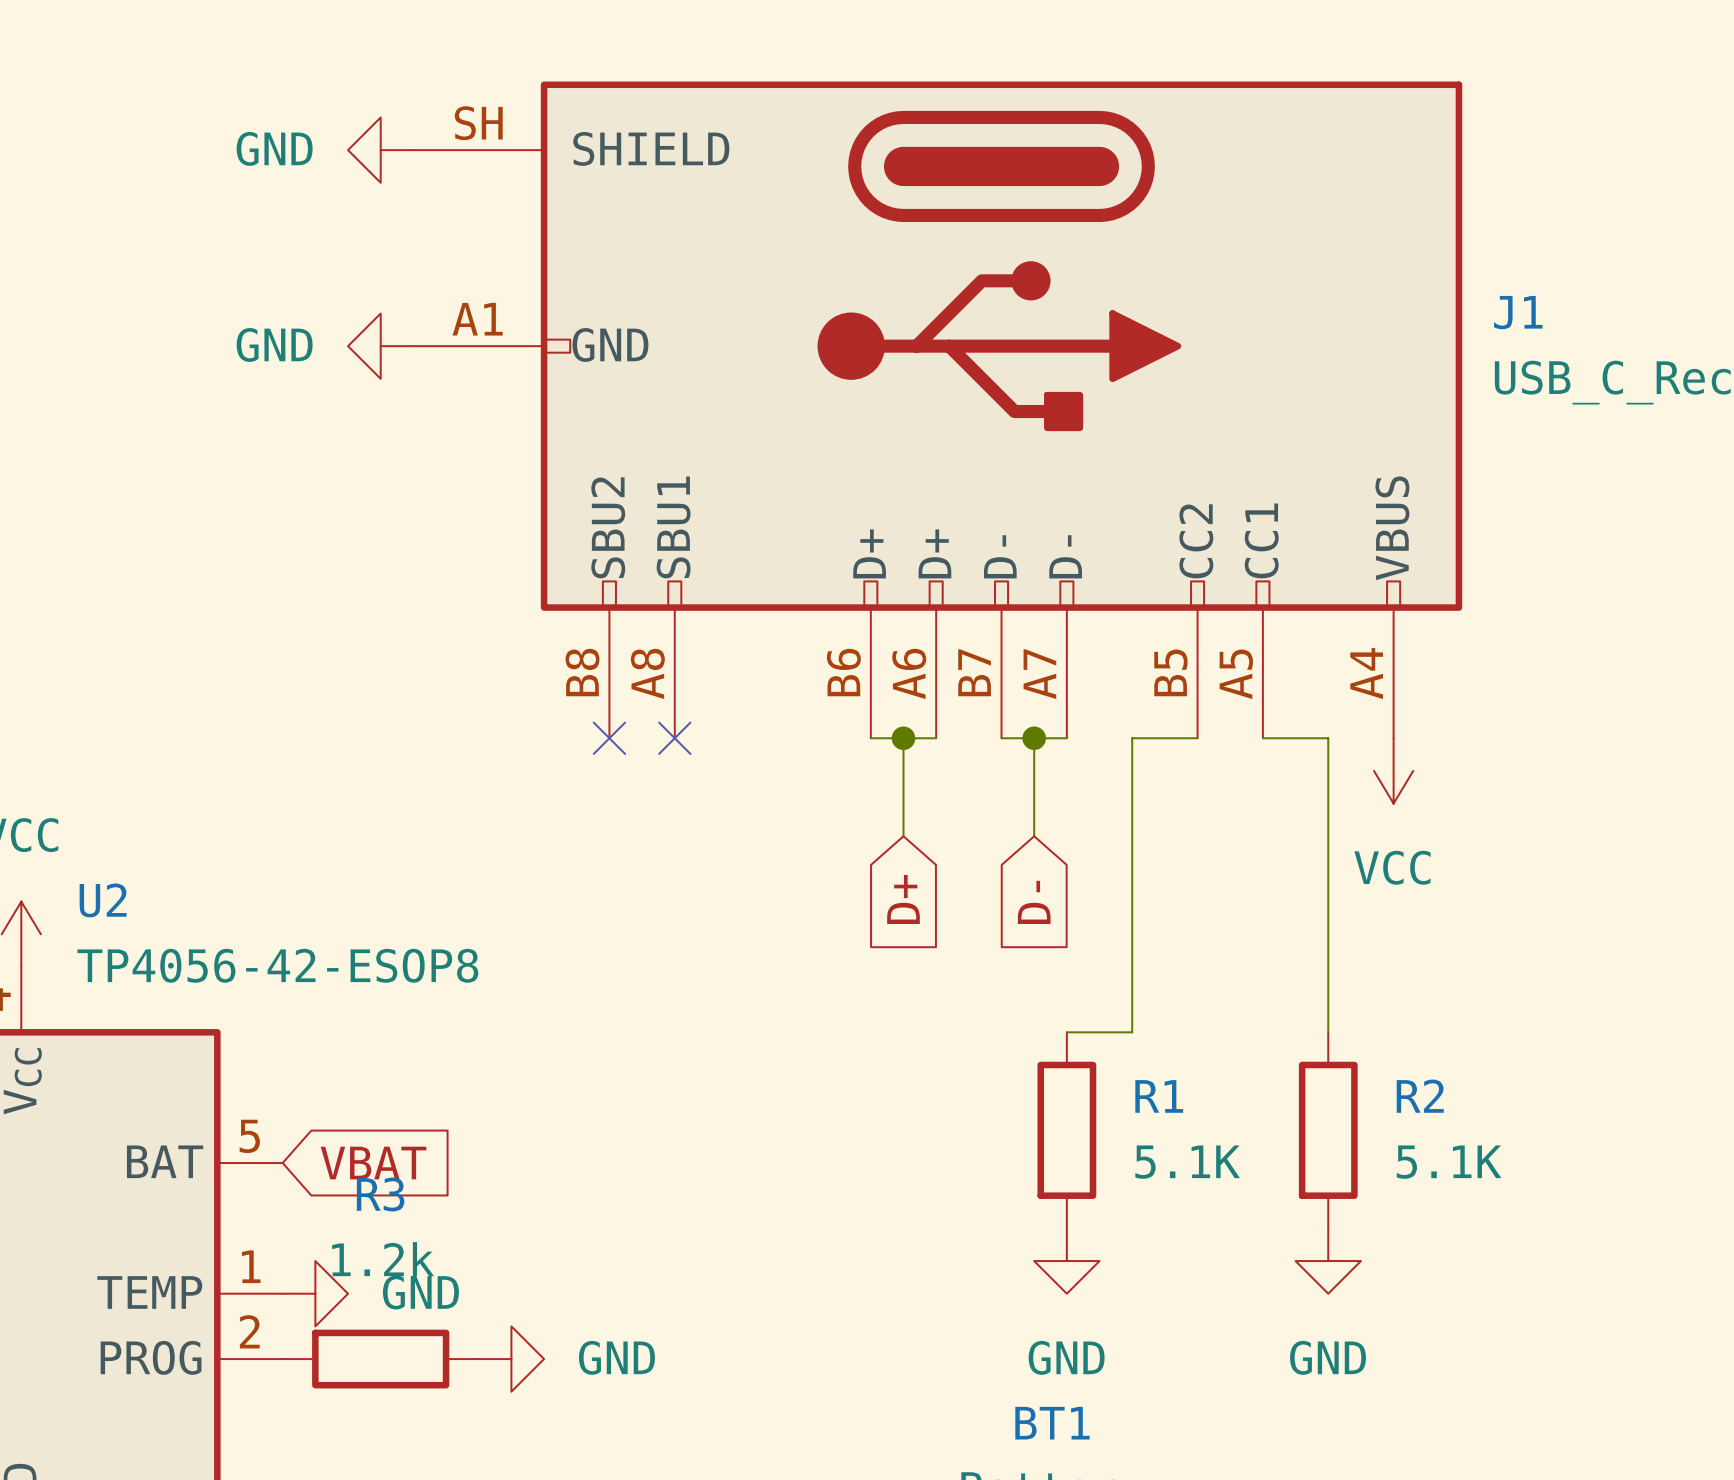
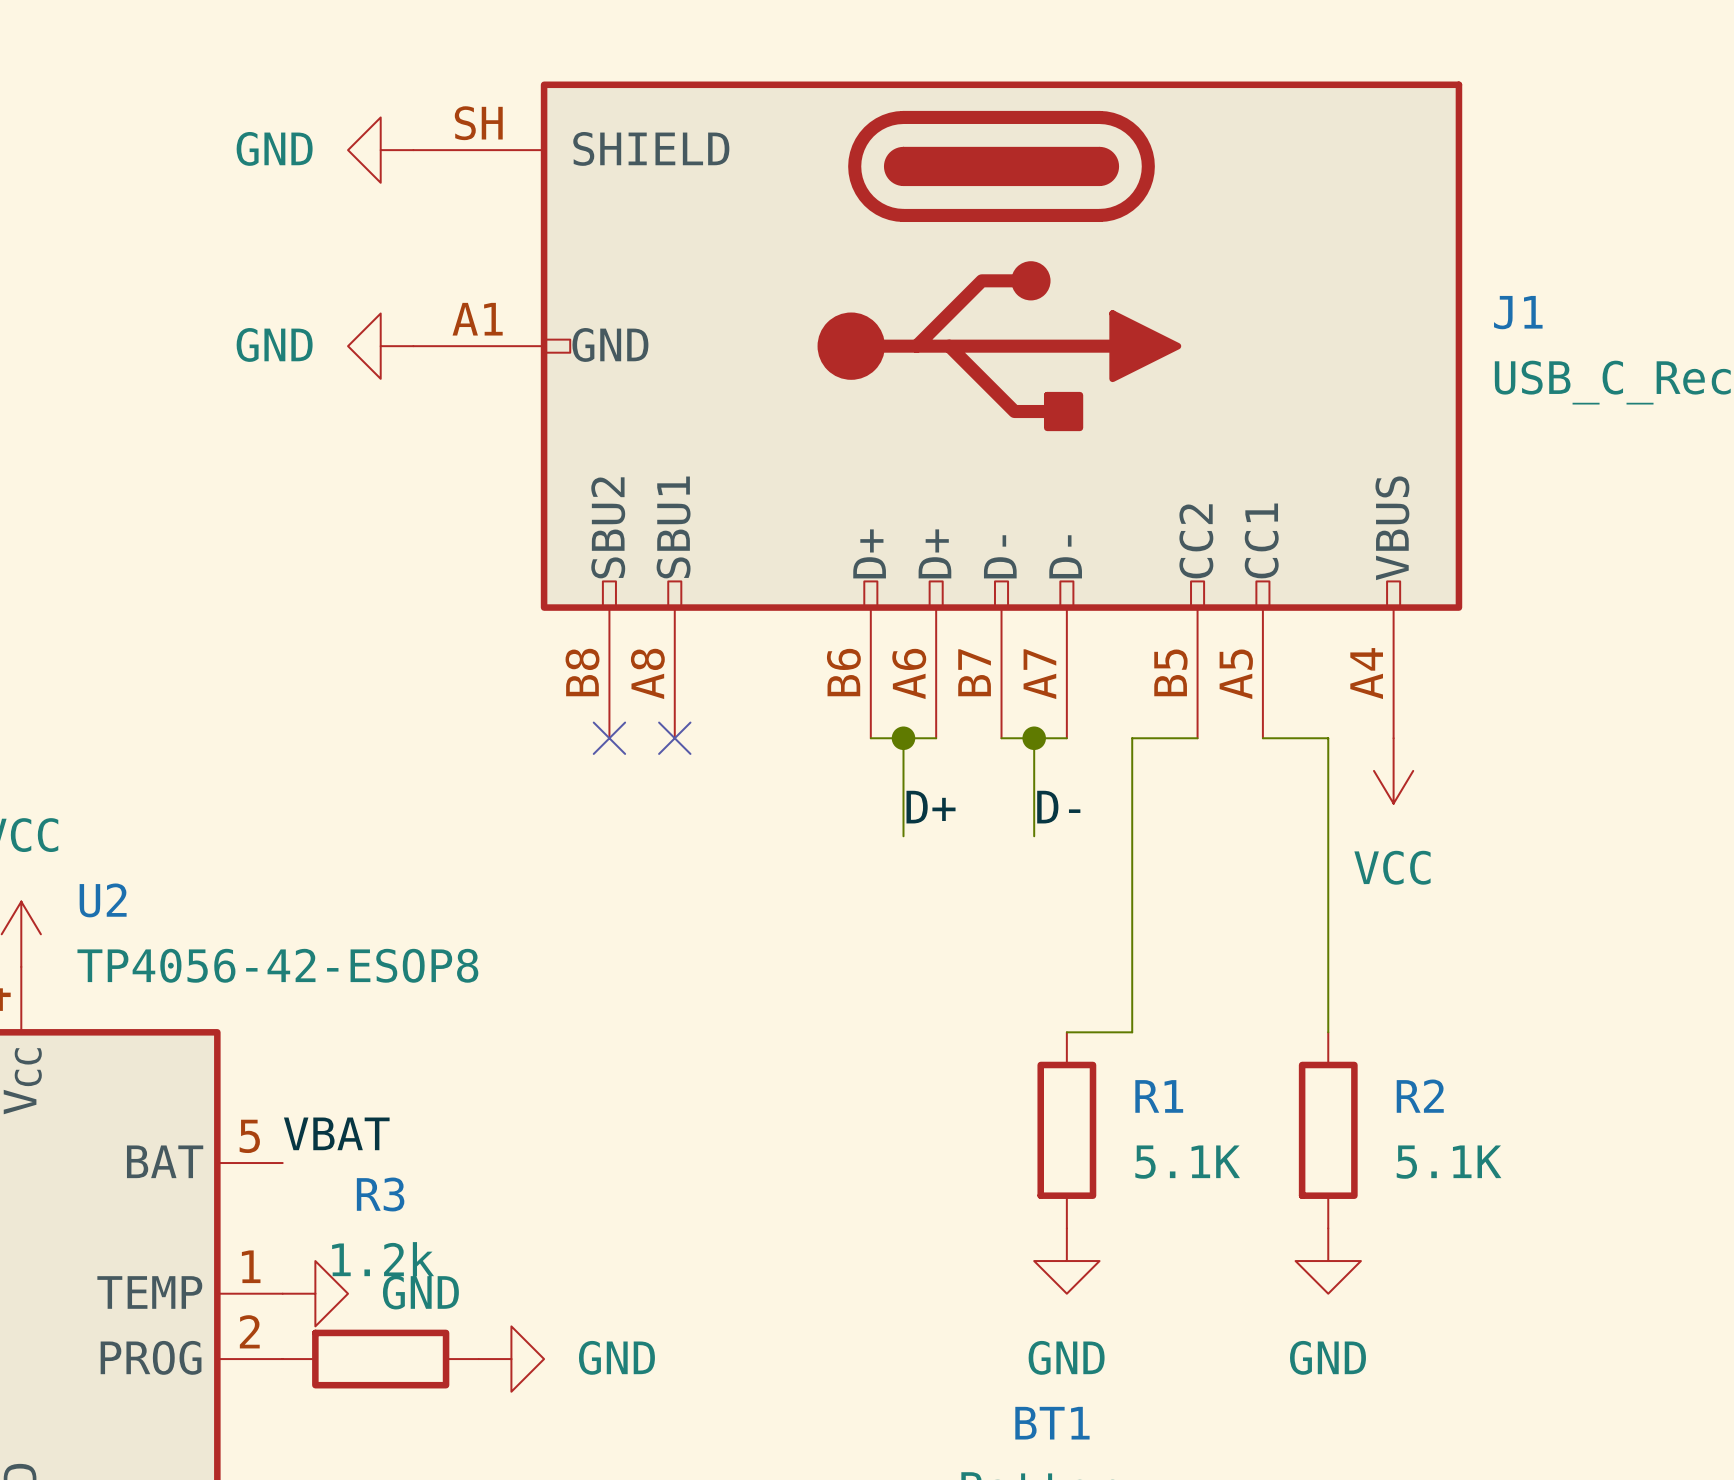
label: none -> D+ (931, 807)
label: none -> D- (1058, 807)
global label: D+ (903, 899) -> none
global label: D- (1034, 902) -> none
label: none -> VBAT (336, 1133)
global label: VBAT (373, 1163) -> none

